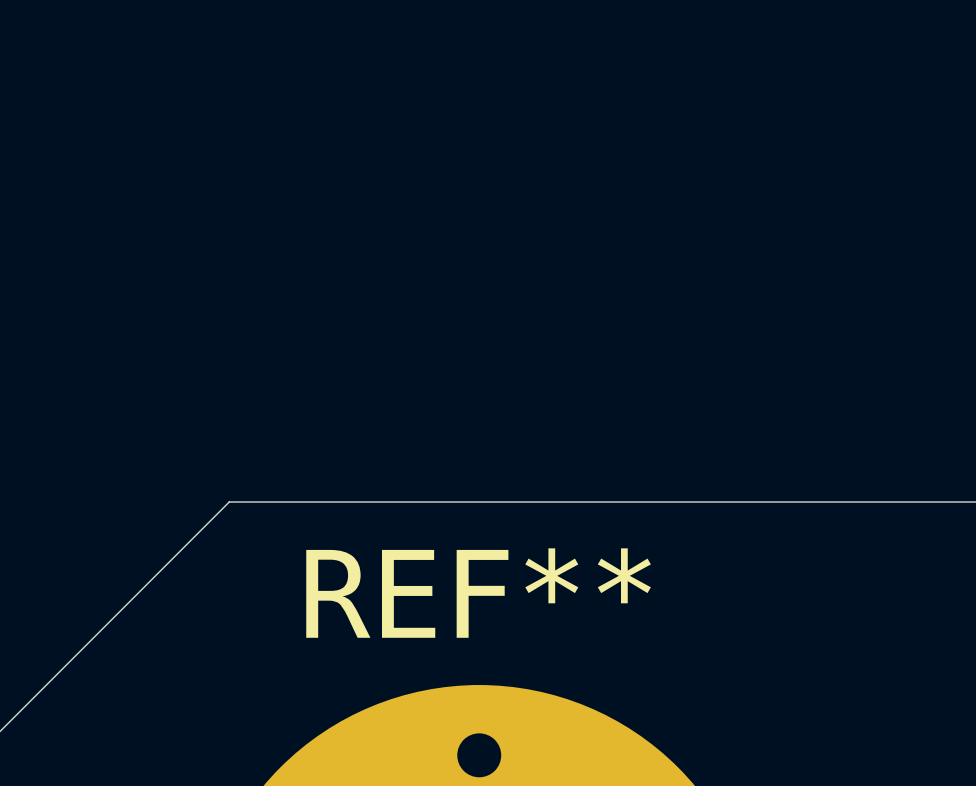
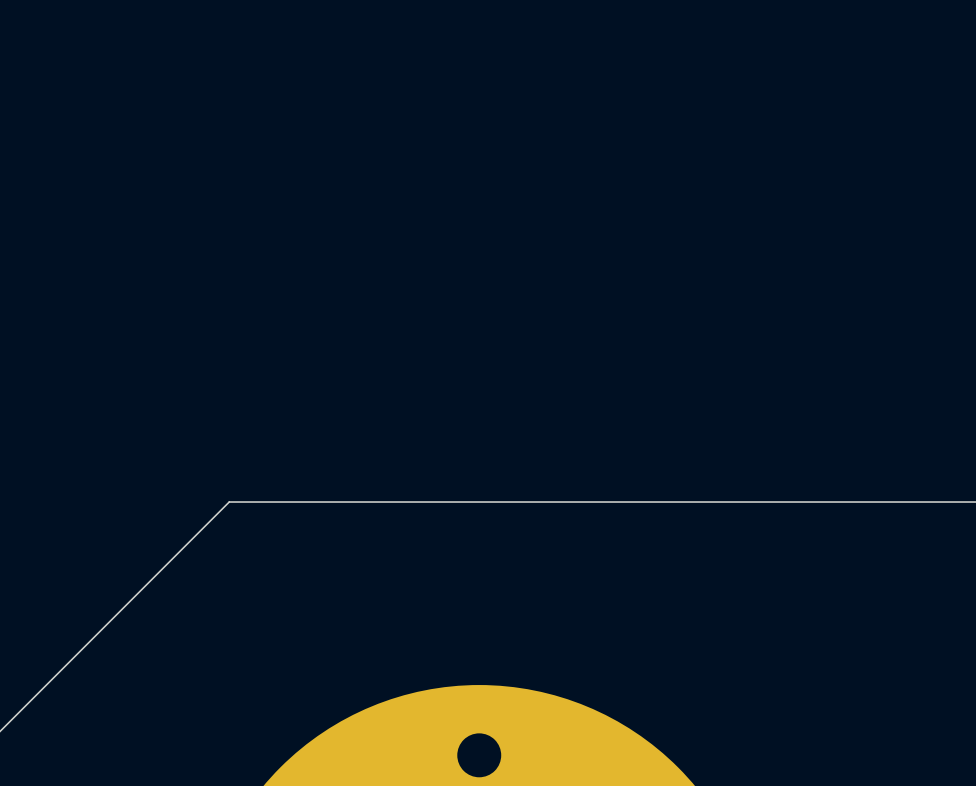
REF** name: REF** (478, 593) -> none

